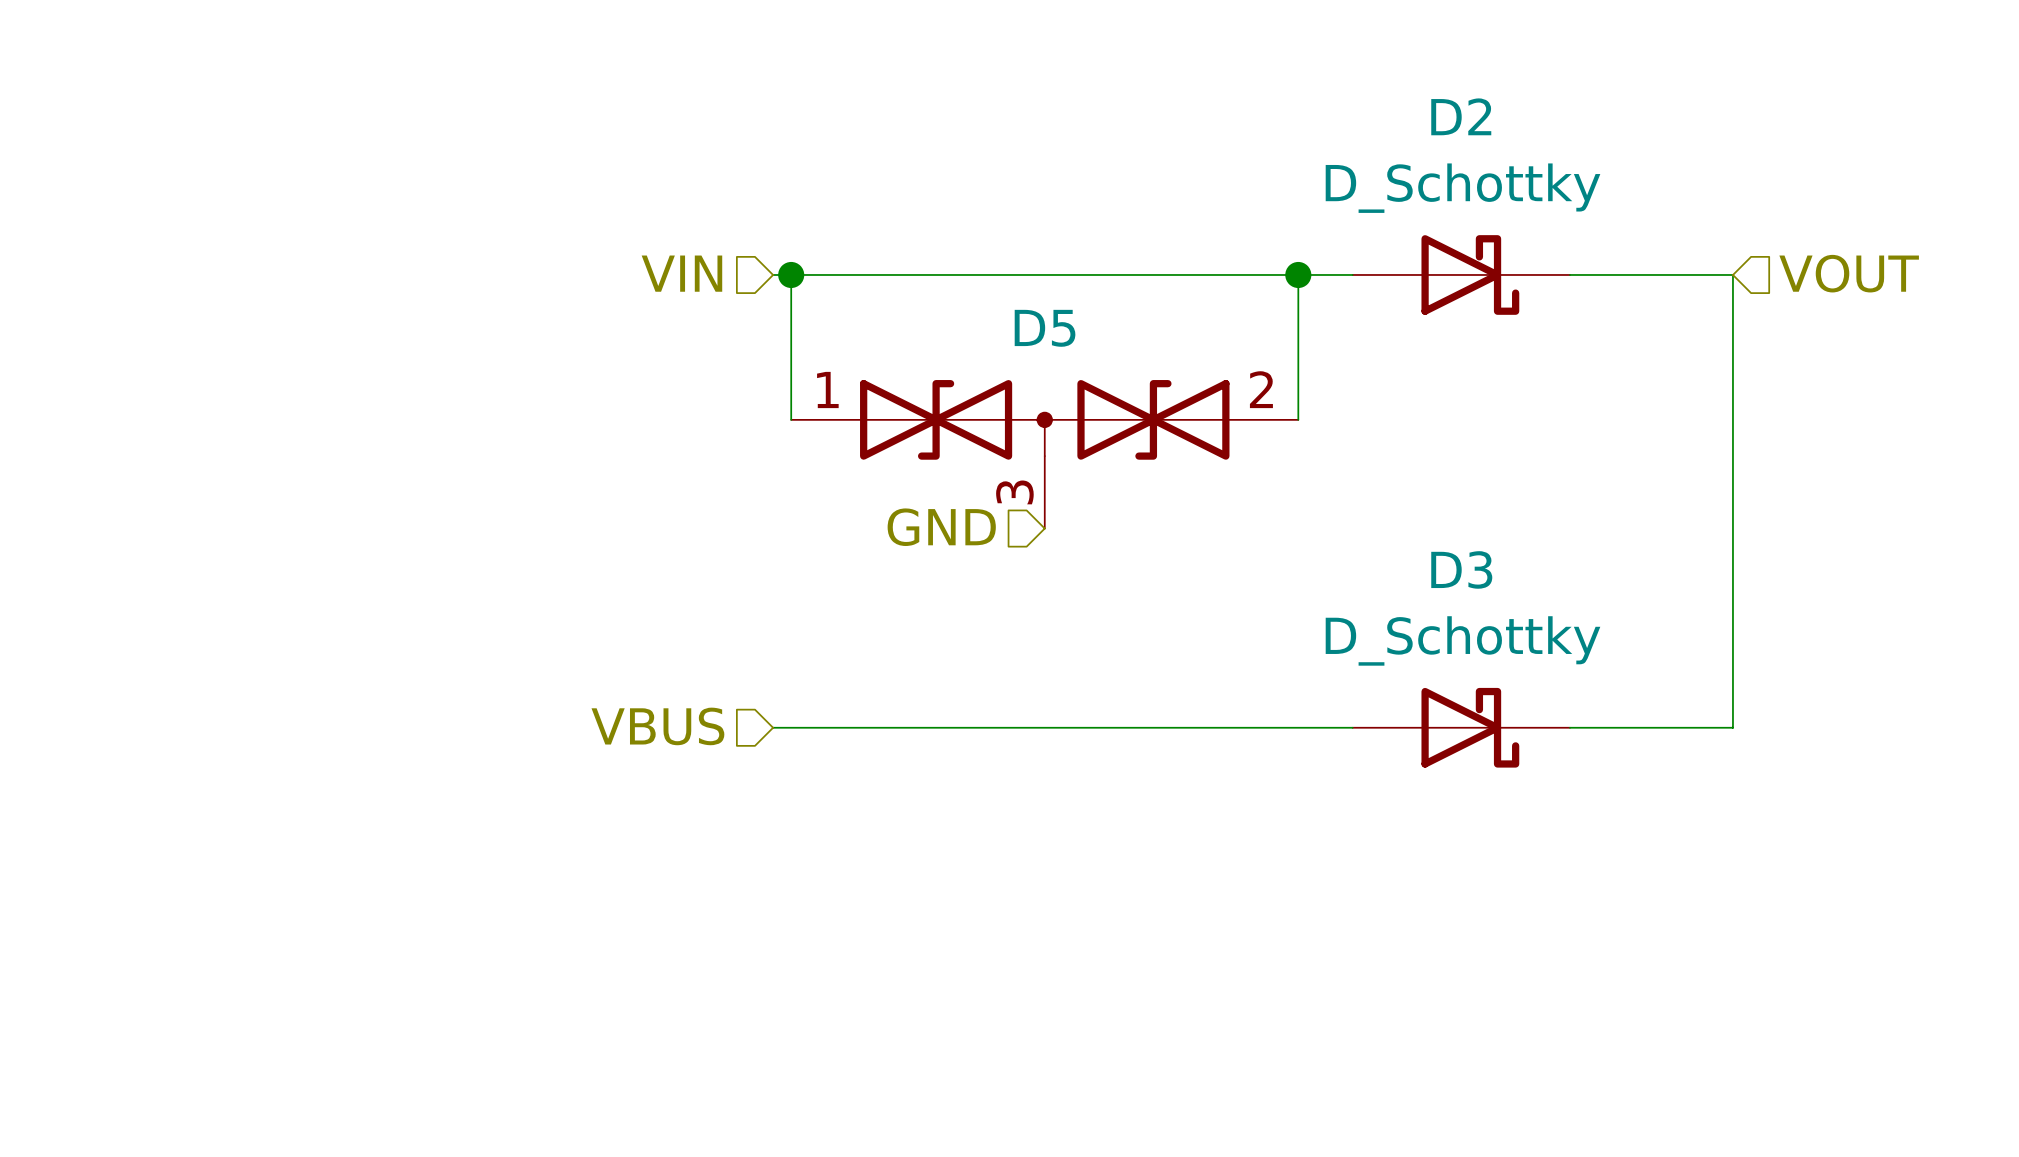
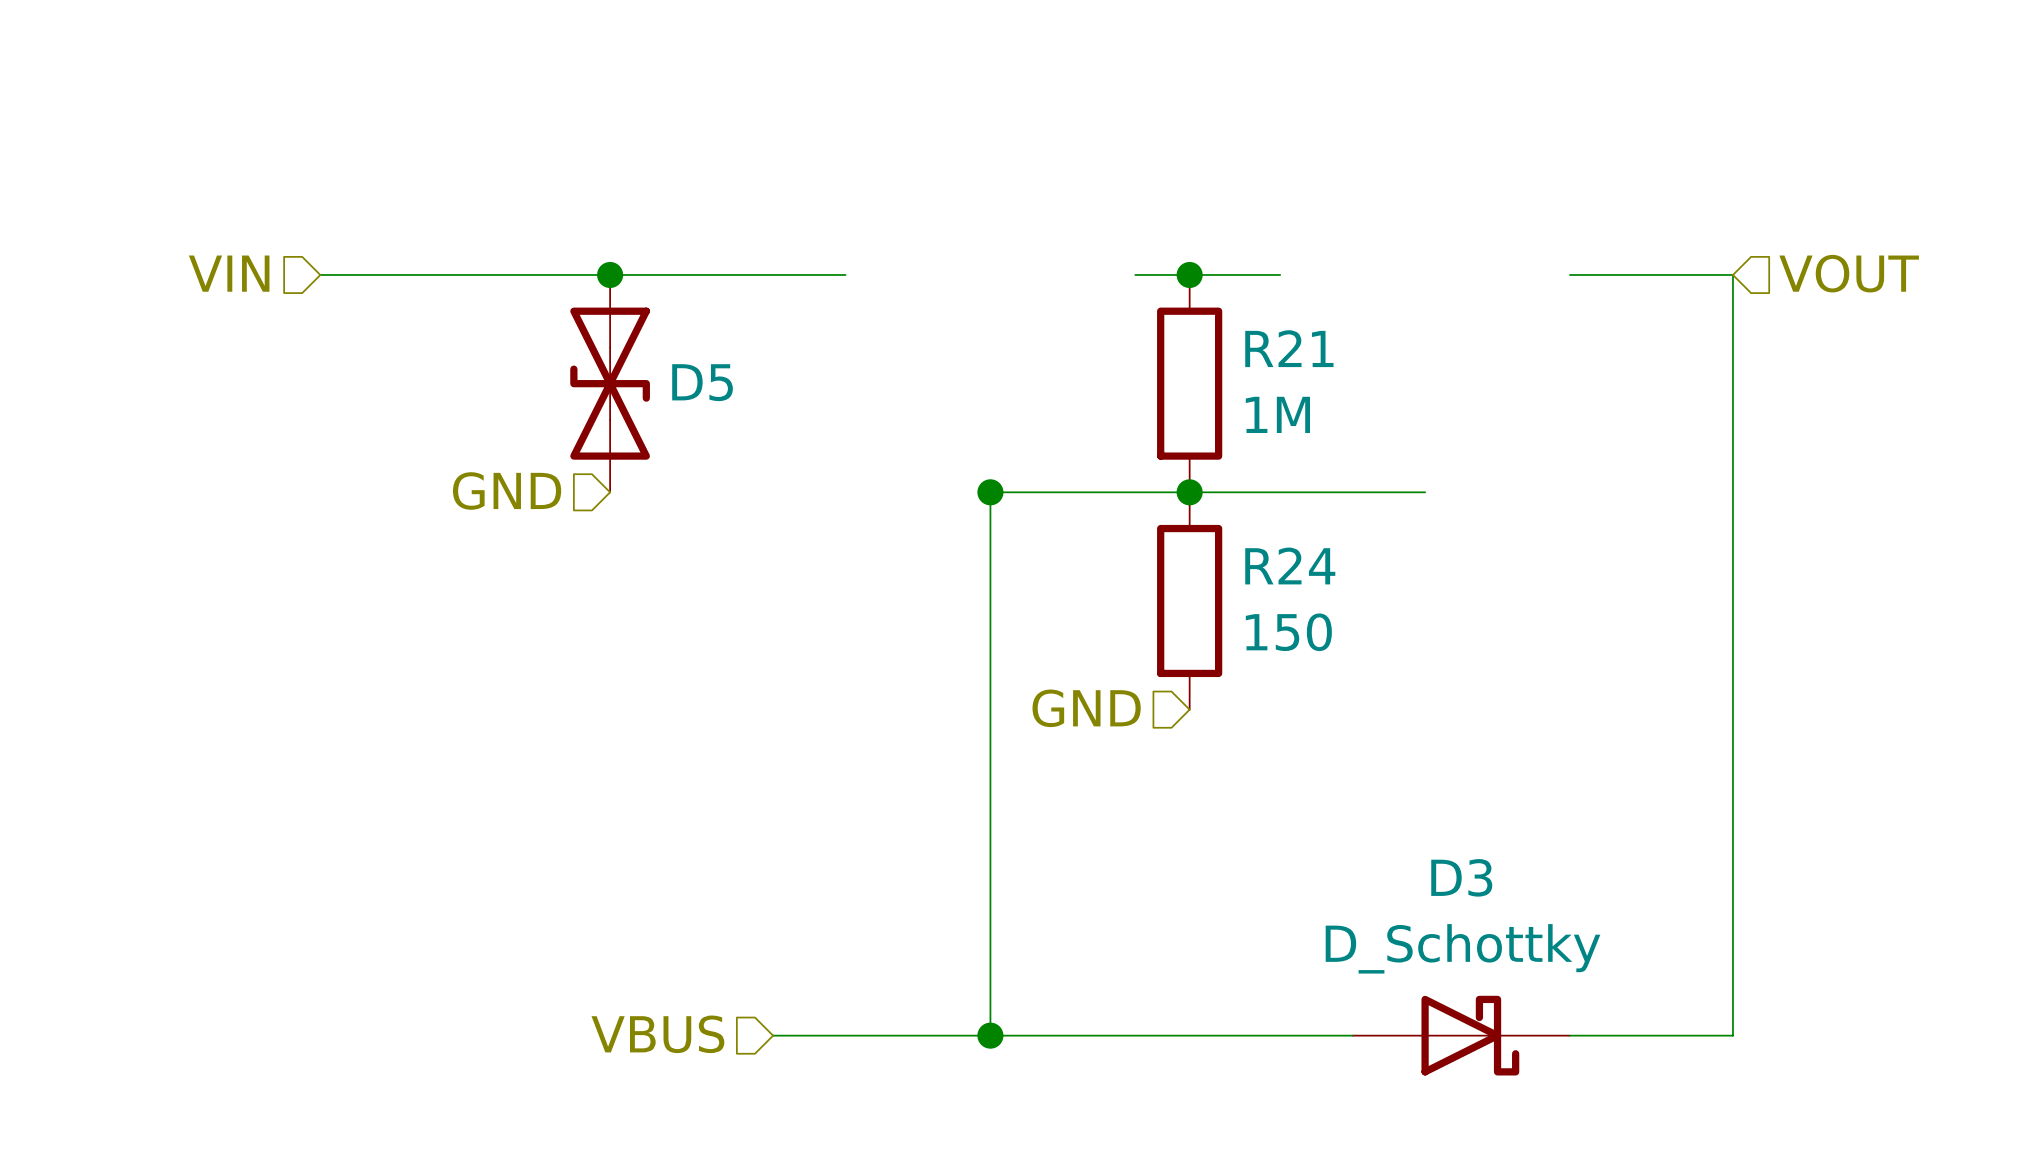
hierarchical label position: VIN (681, 273) -> VIN (229, 273)
wire: none -> (320, 274) (773, 274)
junction: none -> (610, 274)
wire: (791, 274) (791, 419) -> none
junction: (791, 274) -> none
wire: (845, 274) (1135, 274) -> none
wire: (1280, 274) (1352, 274) -> none
wire: (1298, 274) (1298, 419) -> none
junction position: (1298, 274) -> (1189, 274)
D2: D_Schottky (1461, 274) -> none
D5 name position: D5 (1045, 328) -> D5 (702, 382)
D5 symbol: [791, 380, 1299, 529] -> [570, 274, 650, 493]
R21: none -> 1M (1189, 383)
hierarchical label: none -> GND (507, 490)
junction: none -> (990, 492)
junction: none -> (1189, 492)
wire: none -> (1425, 492) (990, 492) (990, 1035)
hierarchical label: GND (941, 527) -> none
R24: none -> 150 (1189, 600)
hierarchical label: none -> GND (1086, 708)
hierarchical label position: VBUS (657, 726) -> VBUS (657, 1034)
wire: (773, 727) (1352, 727) -> (773, 1035) (1352, 1035)
D3 position: (1461, 727) -> (1461, 1035)
wire: (1569, 727) (1732, 727) -> (1569, 1035) (1732, 1035) (1732, 727)
junction: none -> (990, 1035)

